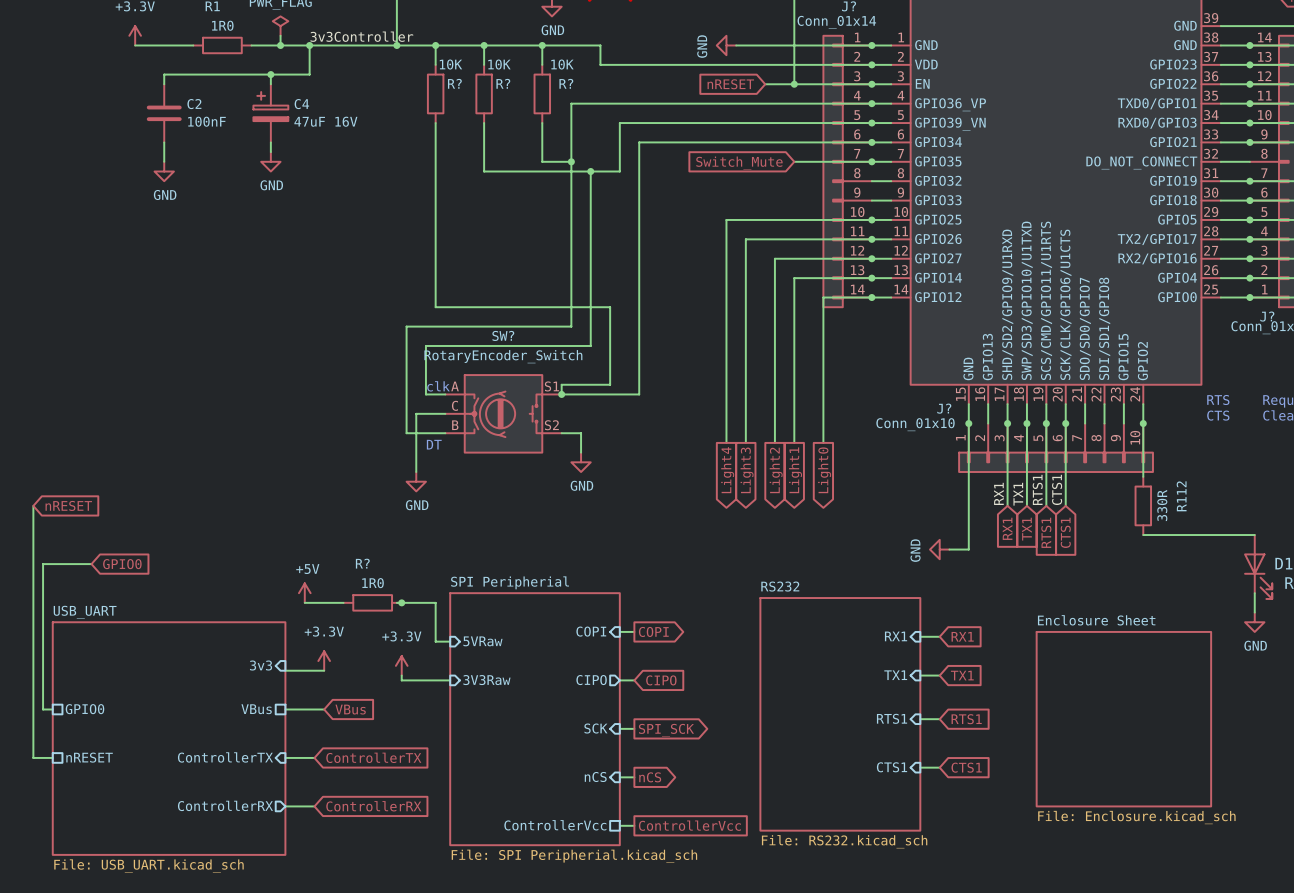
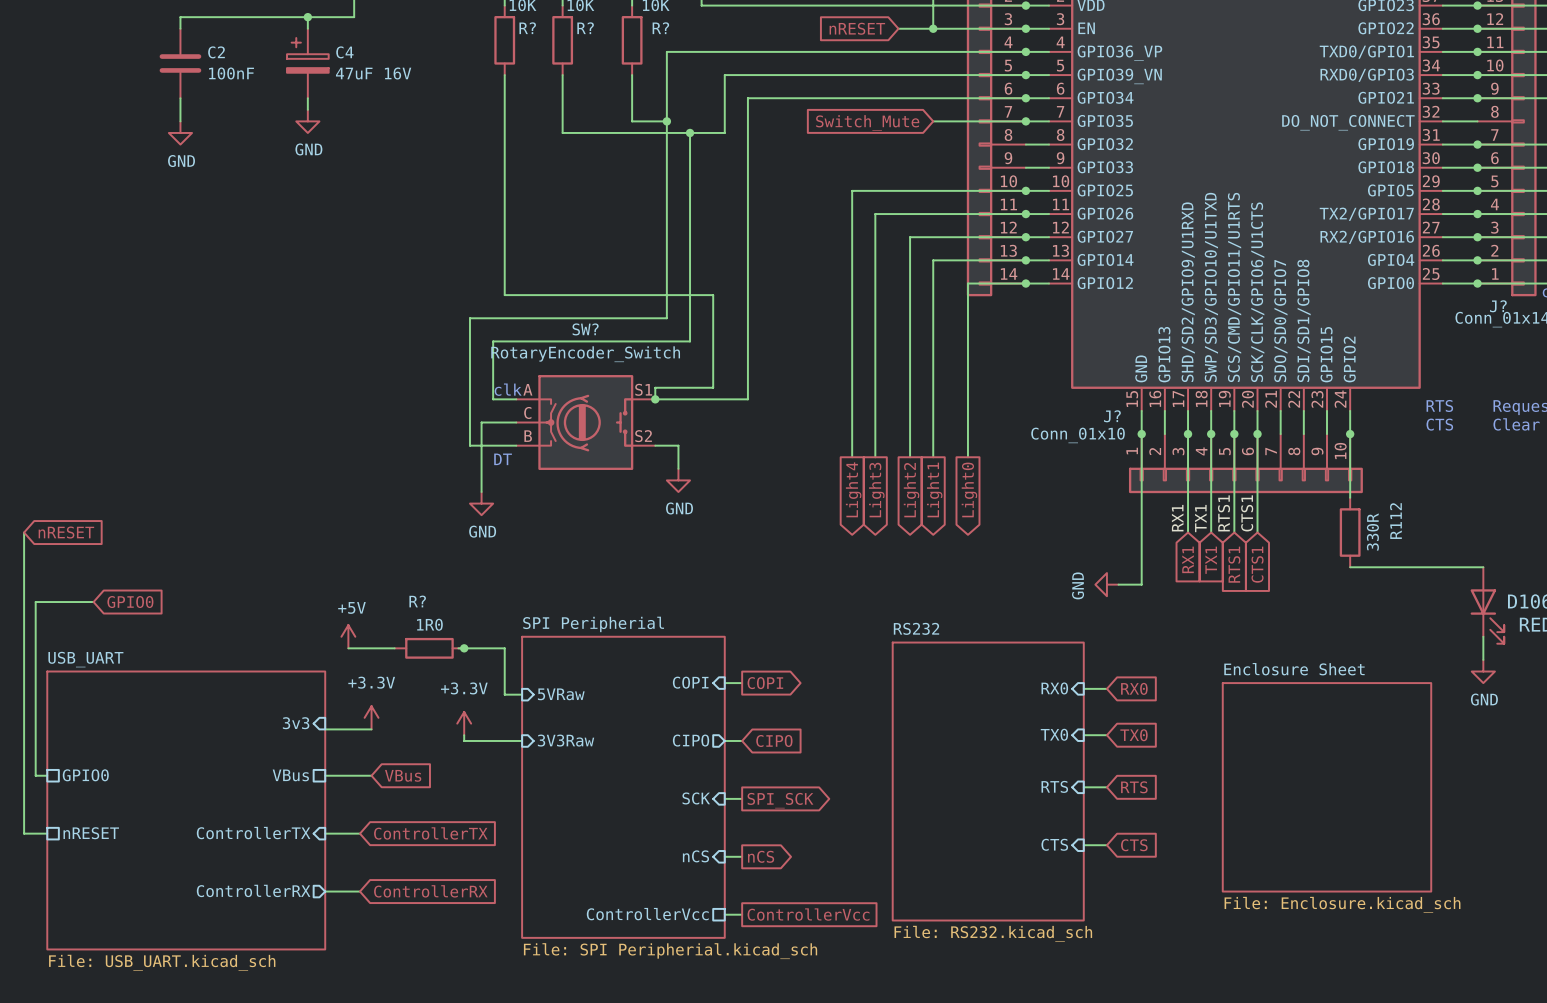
sheet pin: RX1 (896, 636) -> RX0 (1054, 688)
global label: RX1 (962, 636) -> RX0 (1134, 688)
sheet pin: TX1 (895, 675) -> TX0 (1054, 734)
global label: TX1 (962, 675) -> TX0 (1134, 735)
sheet pin: RTS1 (892, 718) -> RTS (1054, 786)
global label: RTS1 (966, 719) -> RTS (1134, 787)
sheet pin: CTS1 (892, 767) -> CTS (1054, 844)
global label: CTS1 (966, 767) -> CTS (1134, 845)

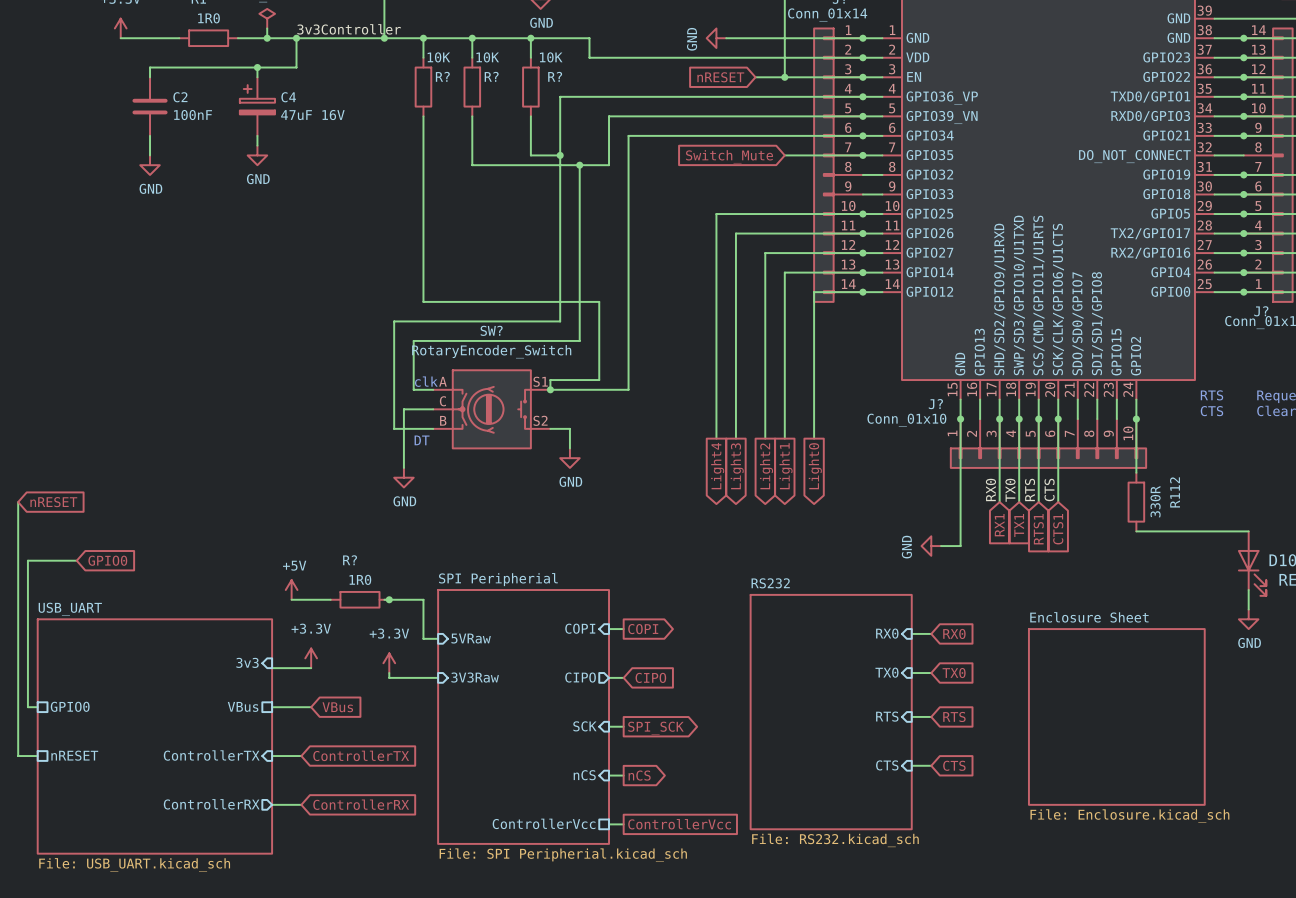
label: RTS1 (1224, 513) -> RTS (1030, 489)
label: CTS1 (1247, 513) -> CTS (1049, 490)
label: RX1 (1177, 518) -> RX0 (990, 489)
label: TX1 (1200, 518) -> TX0 (1010, 490)

